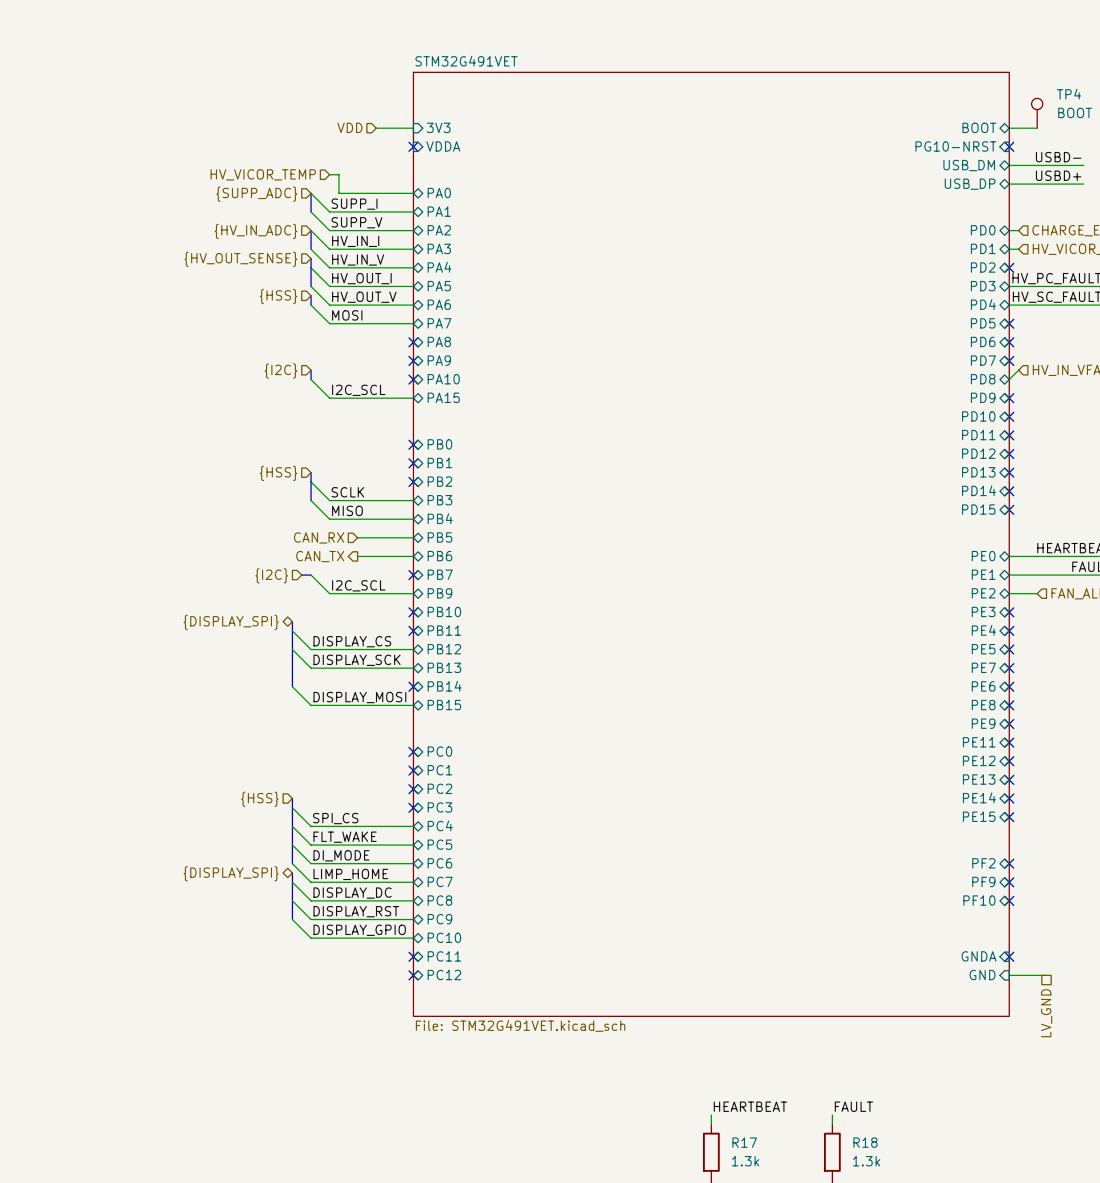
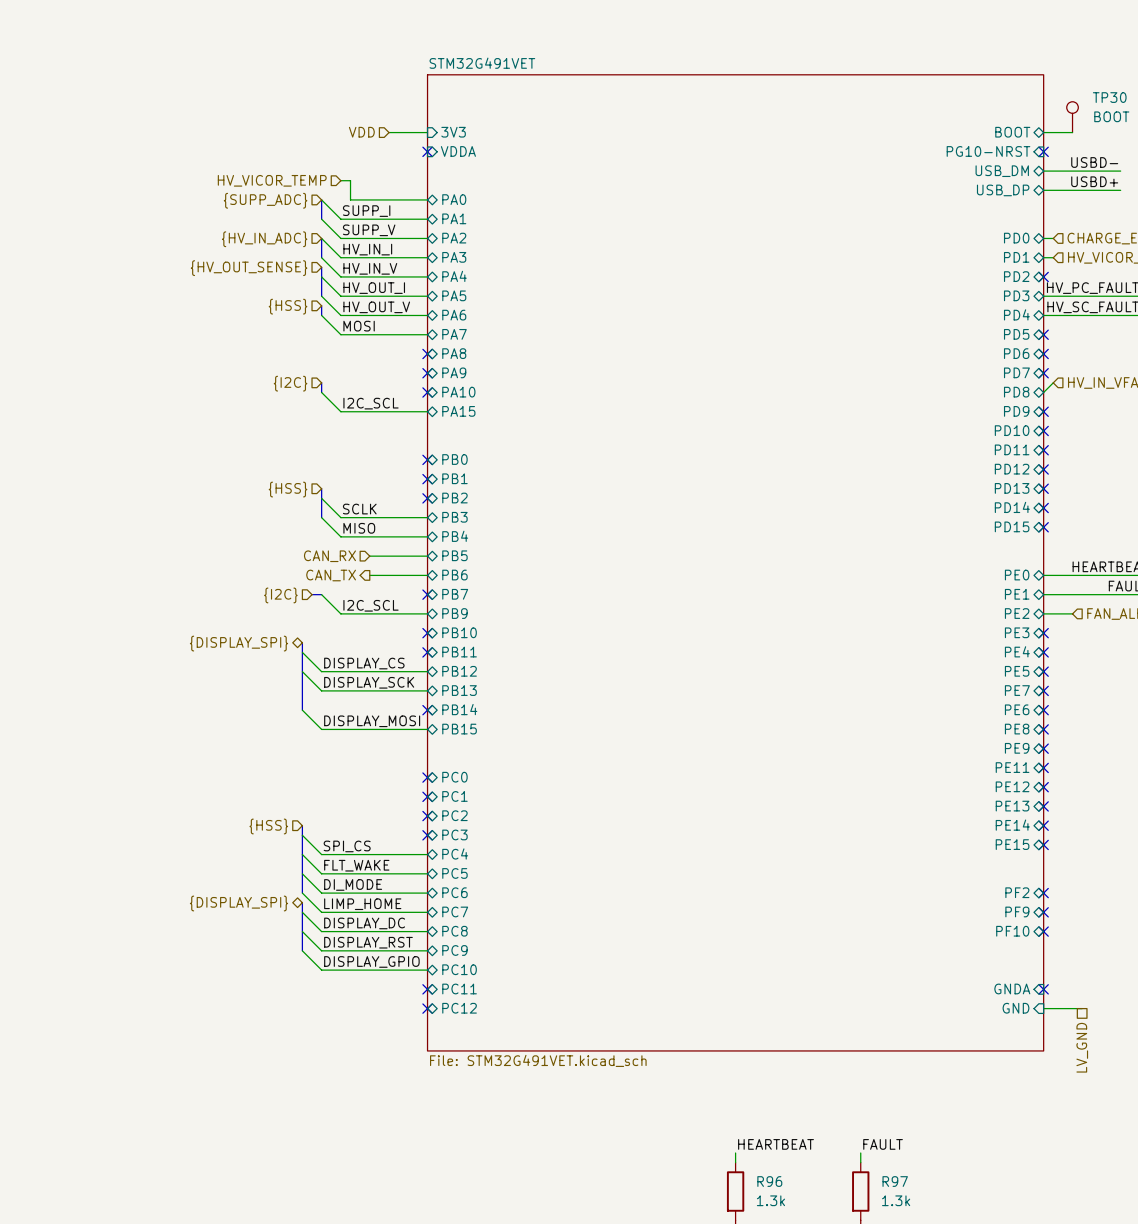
TP4 name: TP4 (1068, 94) -> TP30 (1109, 97)
R17 name: R17 (744, 1142) -> R96 (769, 1181)
R18 name: R18 (865, 1142) -> R97 (895, 1181)

